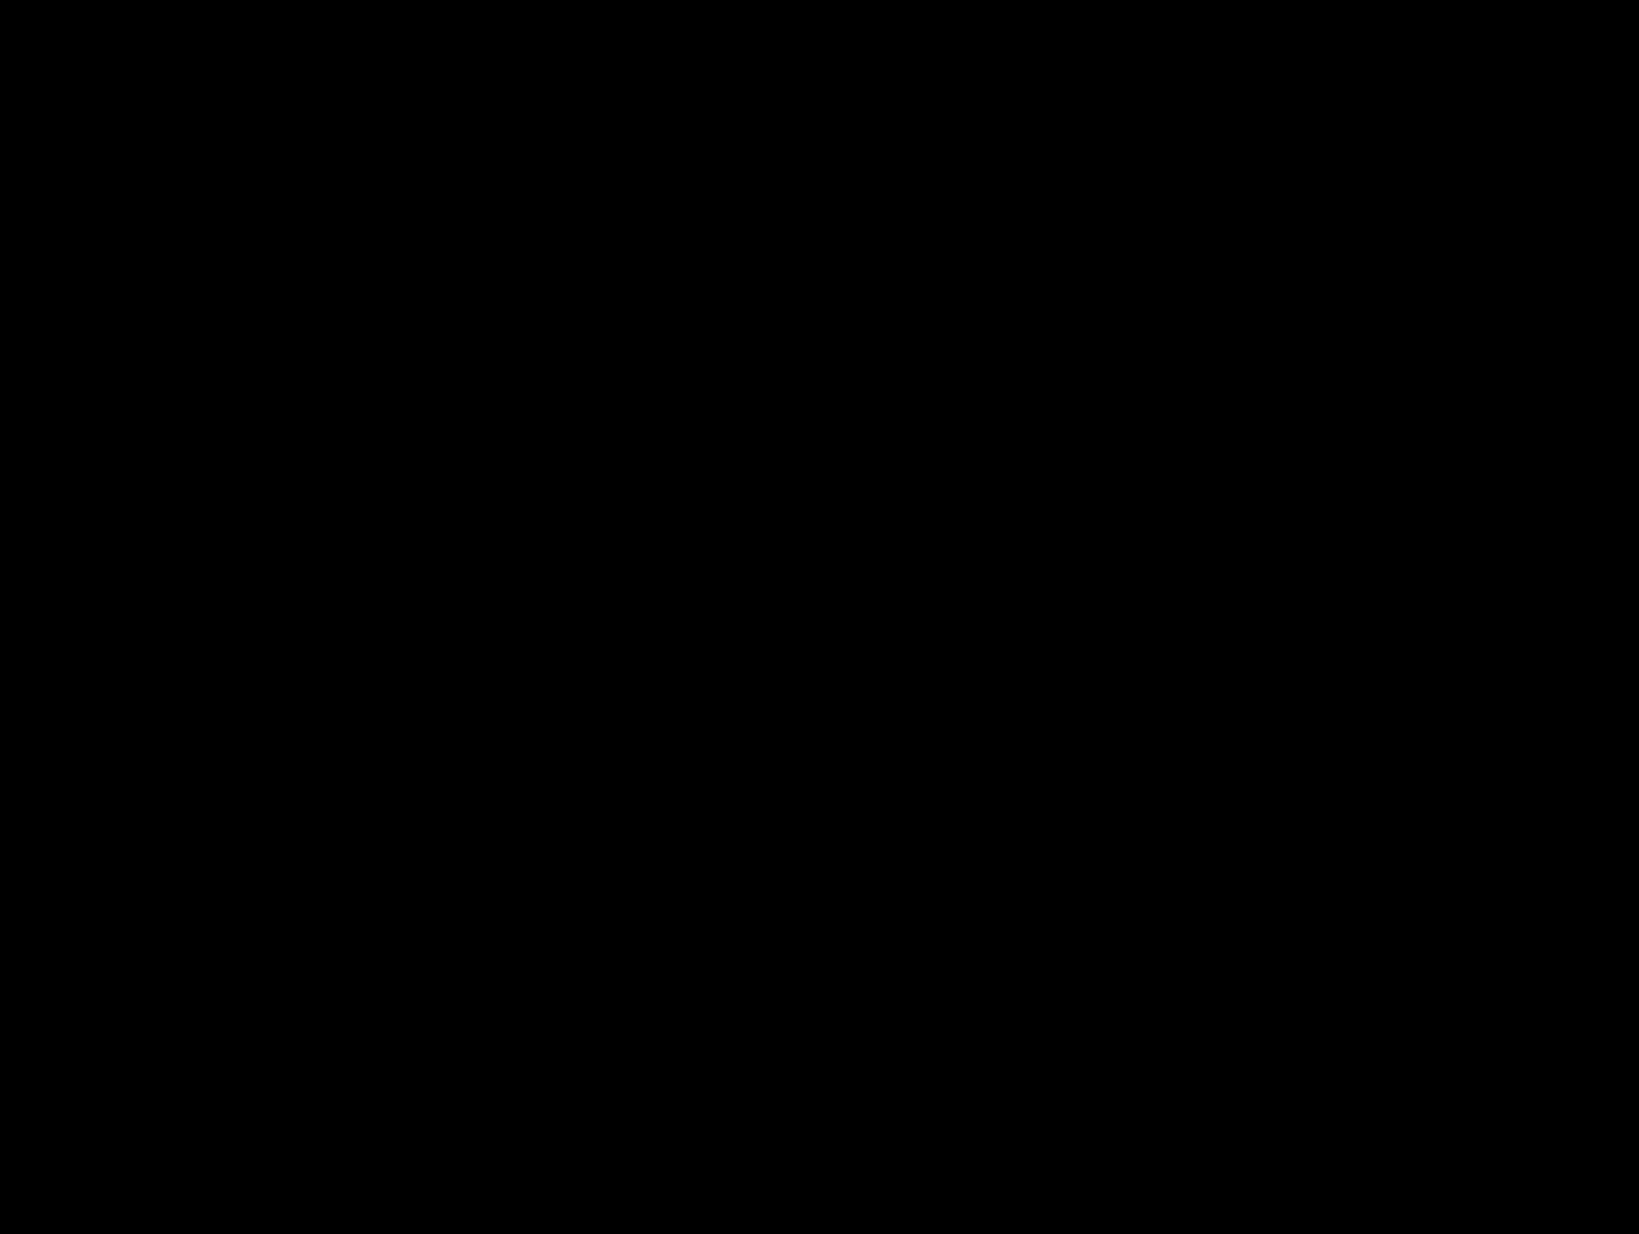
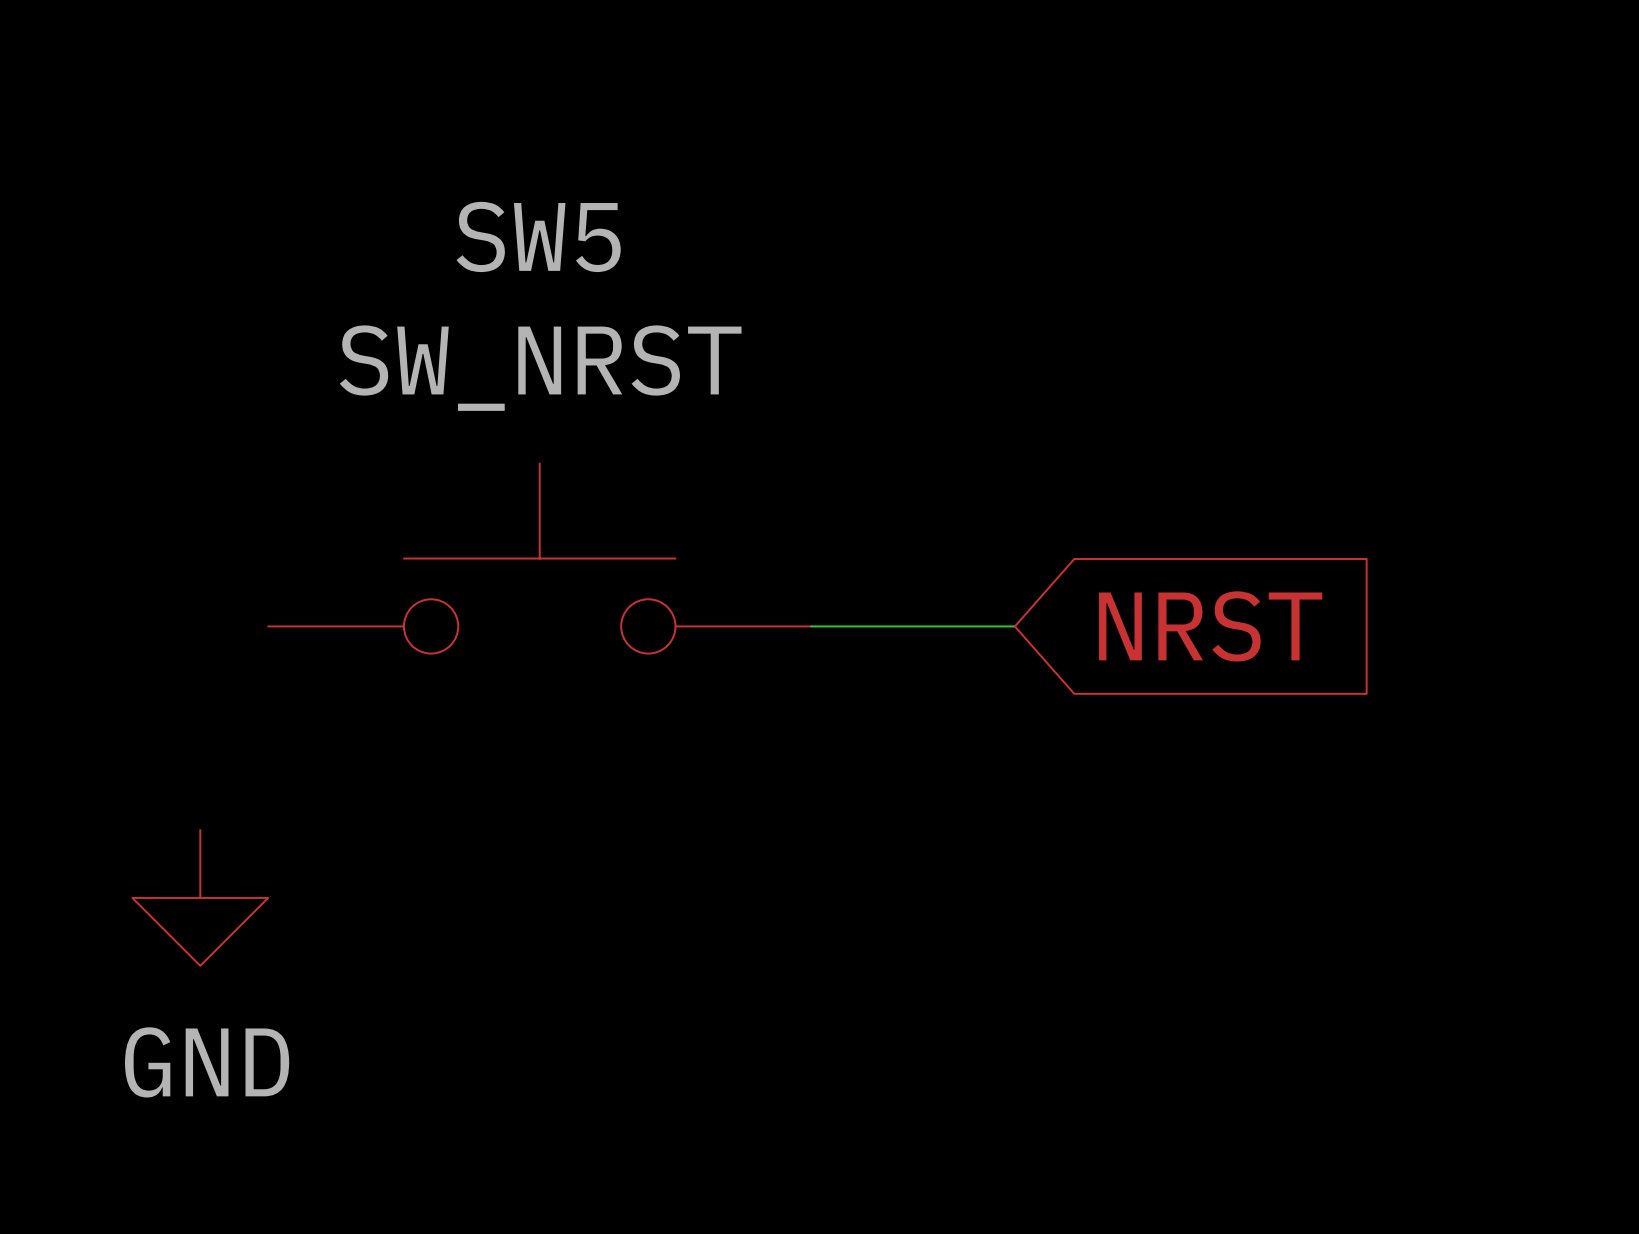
SW5: none -> SW_NRST (539, 558)
wire: none -> (811, 626) (1014, 626)
global label: none -> NRST (1210, 626)
power symbol: none -> GND (200, 897)

